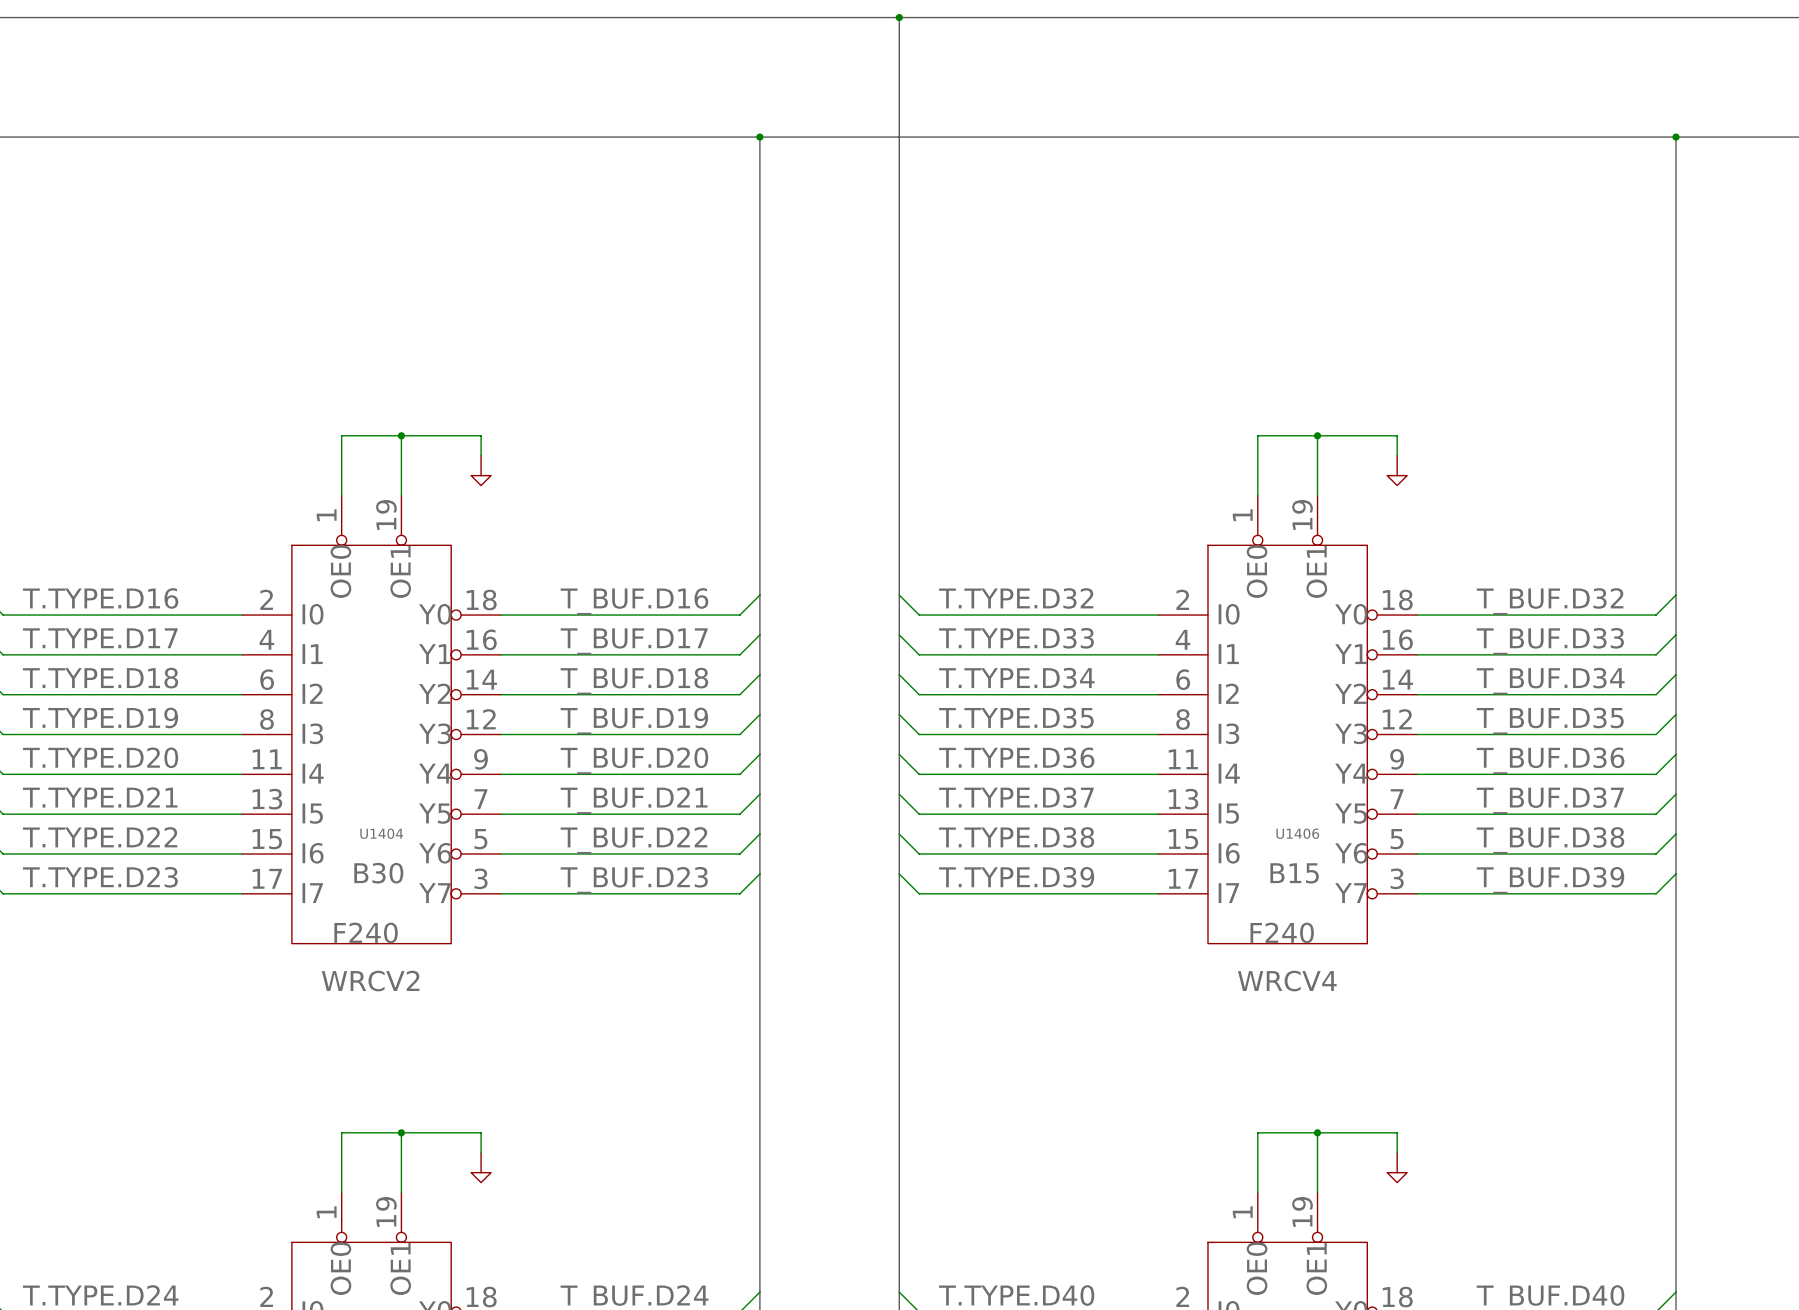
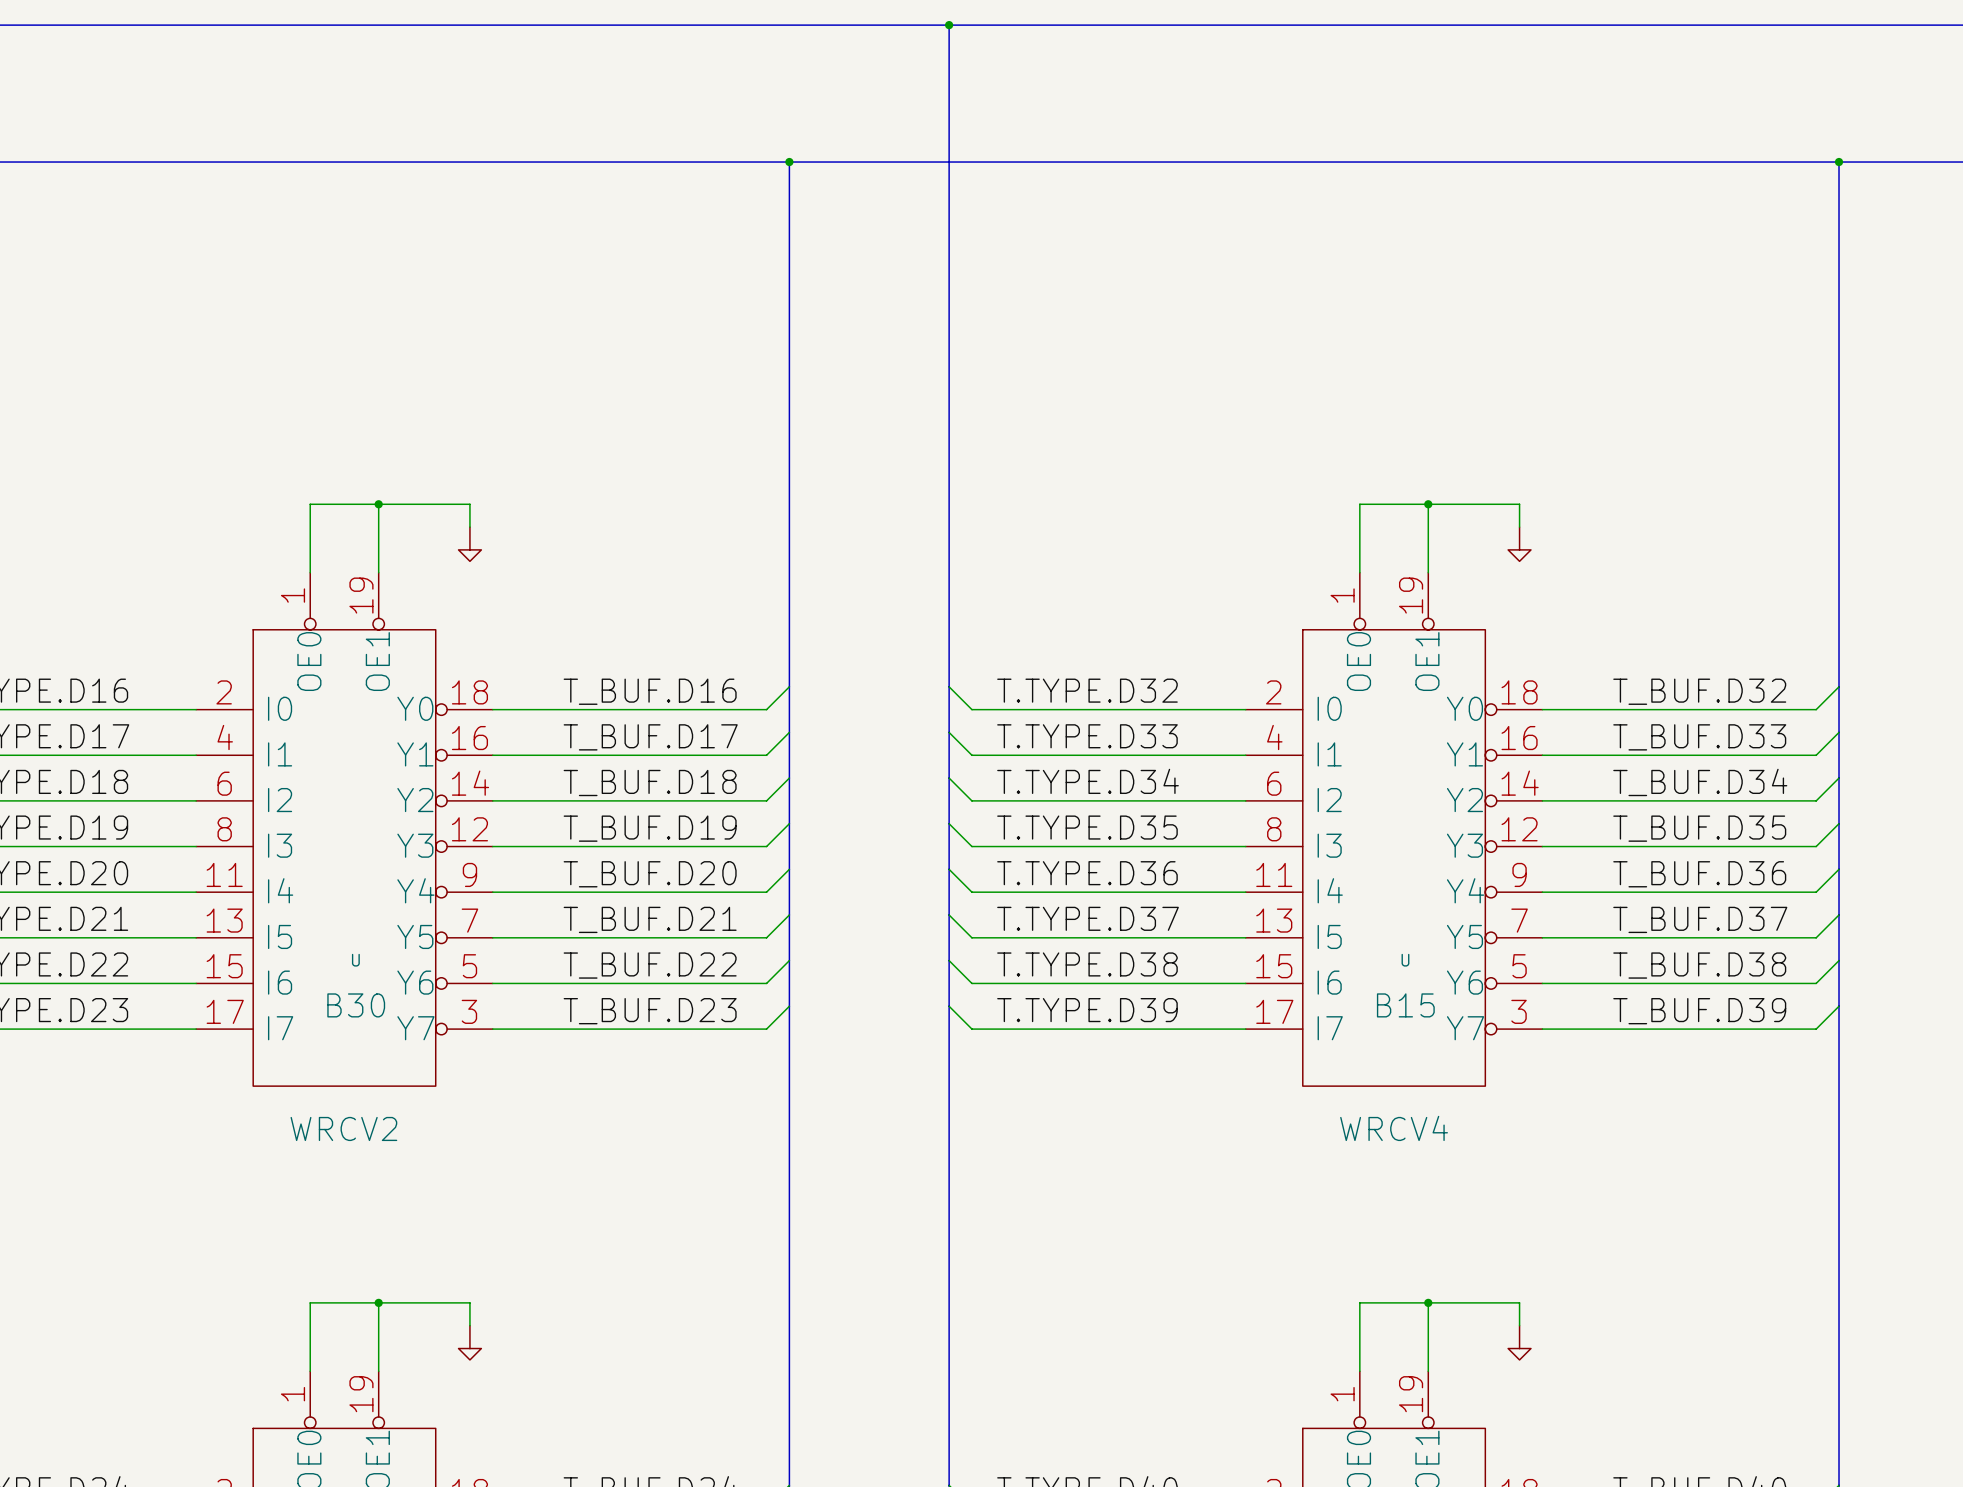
U1404 name: U1404 (381, 833) -> U (355, 960)
U1406 name: U1406 (1297, 833) -> U (1405, 960)
U1404 value: F240 (366, 932) -> none
U1406 value: F240 (1282, 932) -> none

